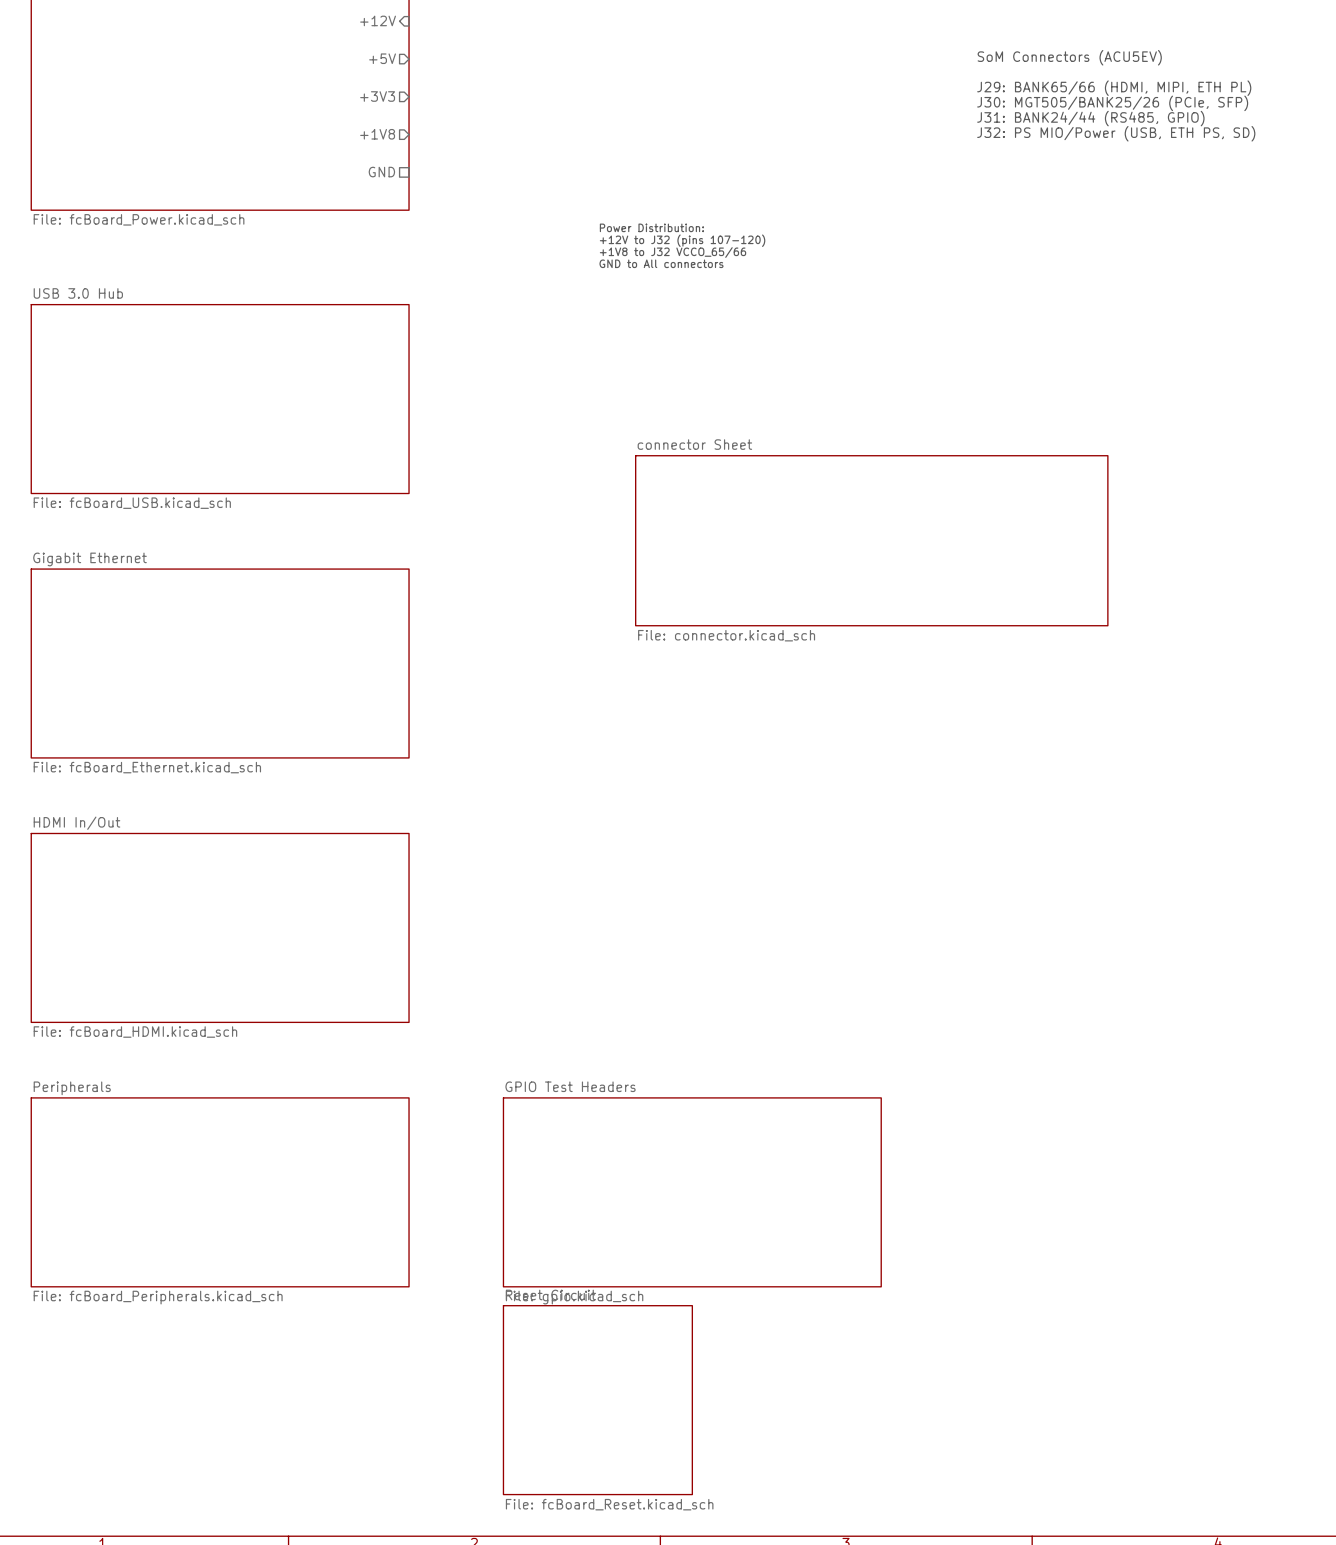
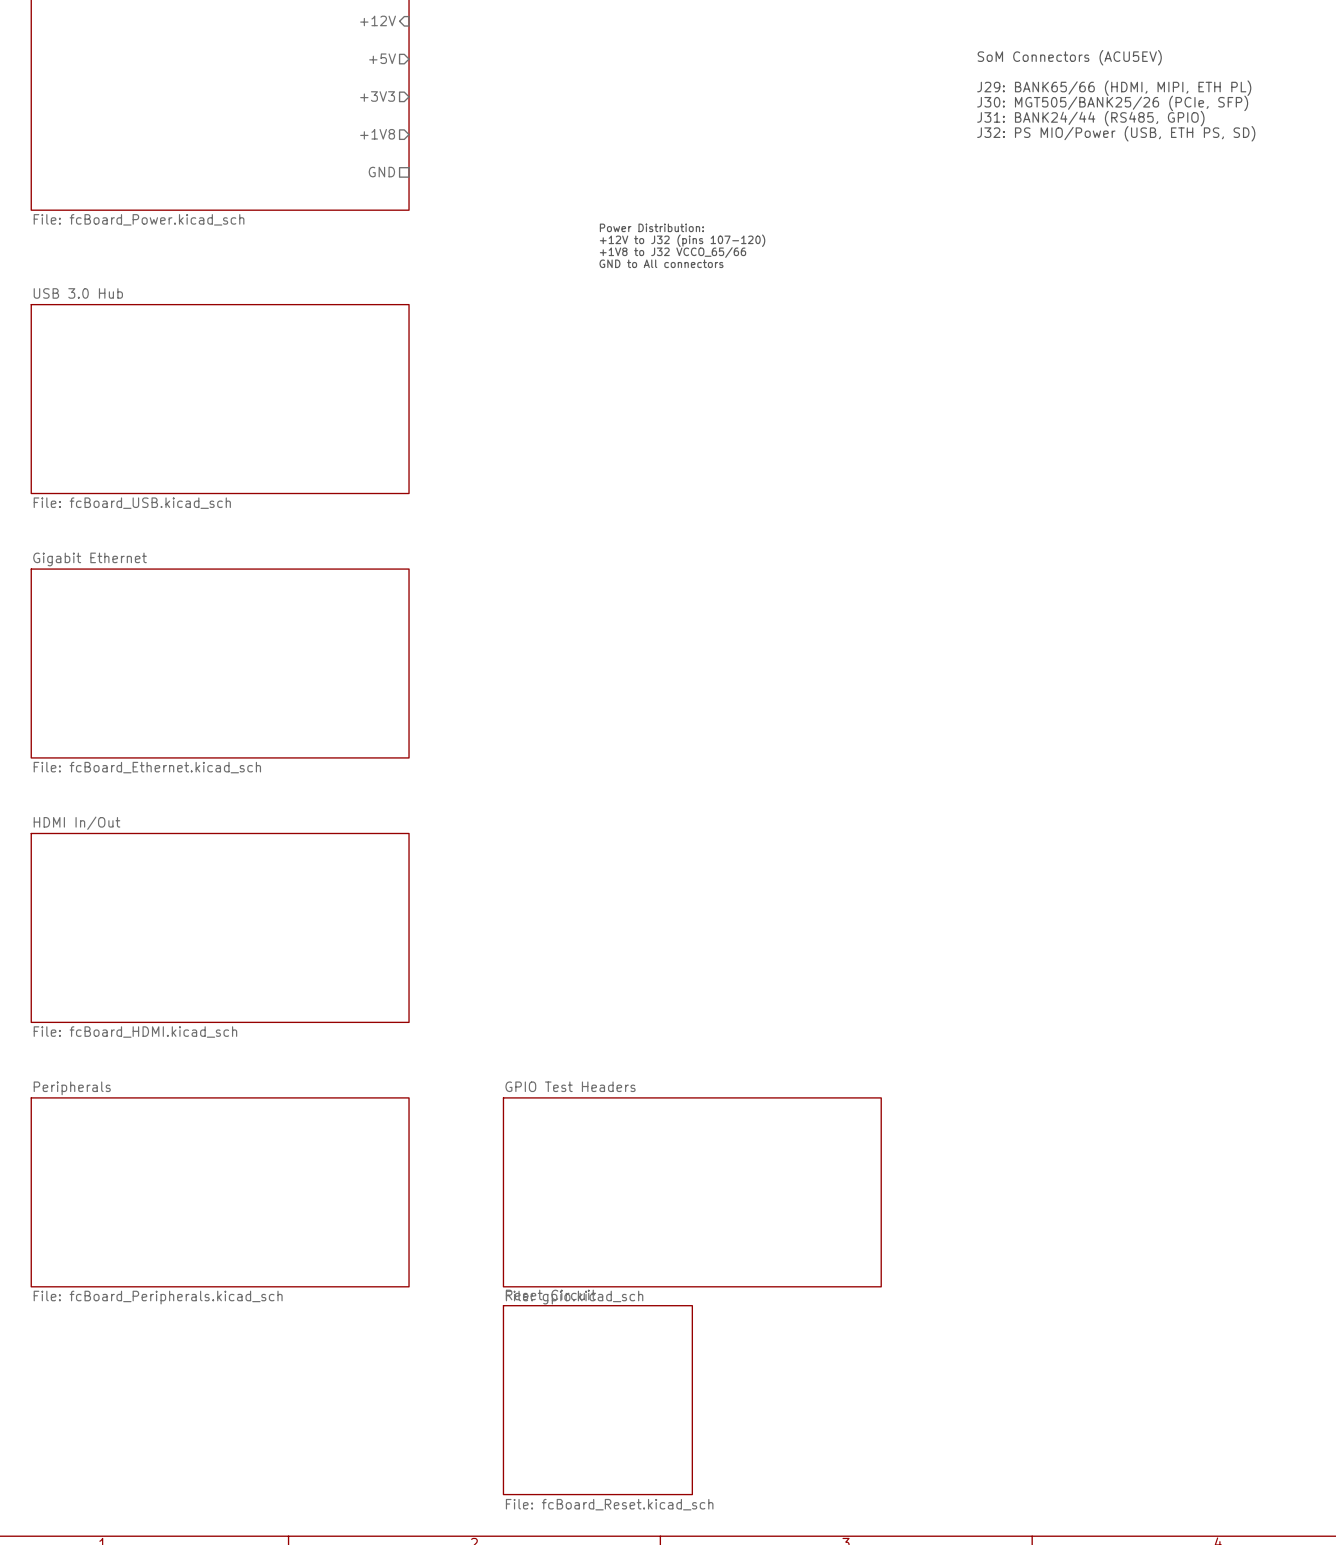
sheet connector Sheet: File: connector.kicad_sch (871, 540) -> none

